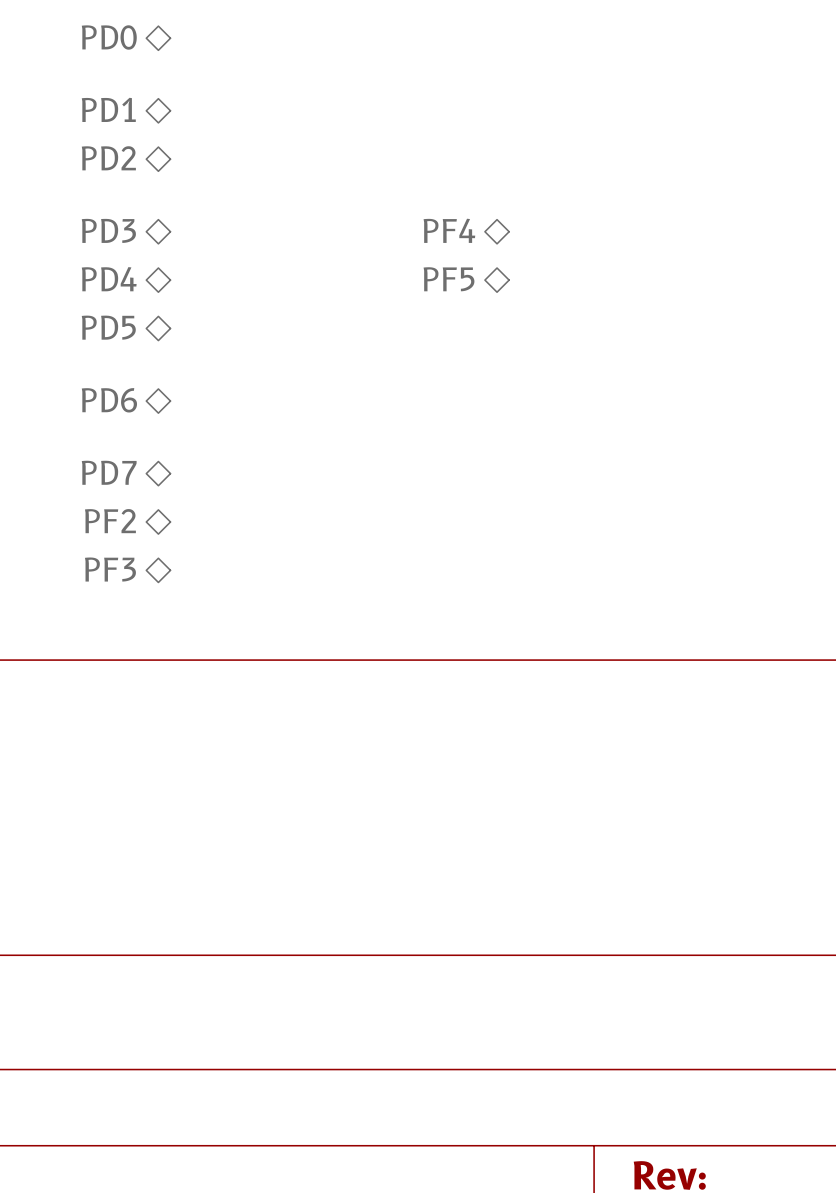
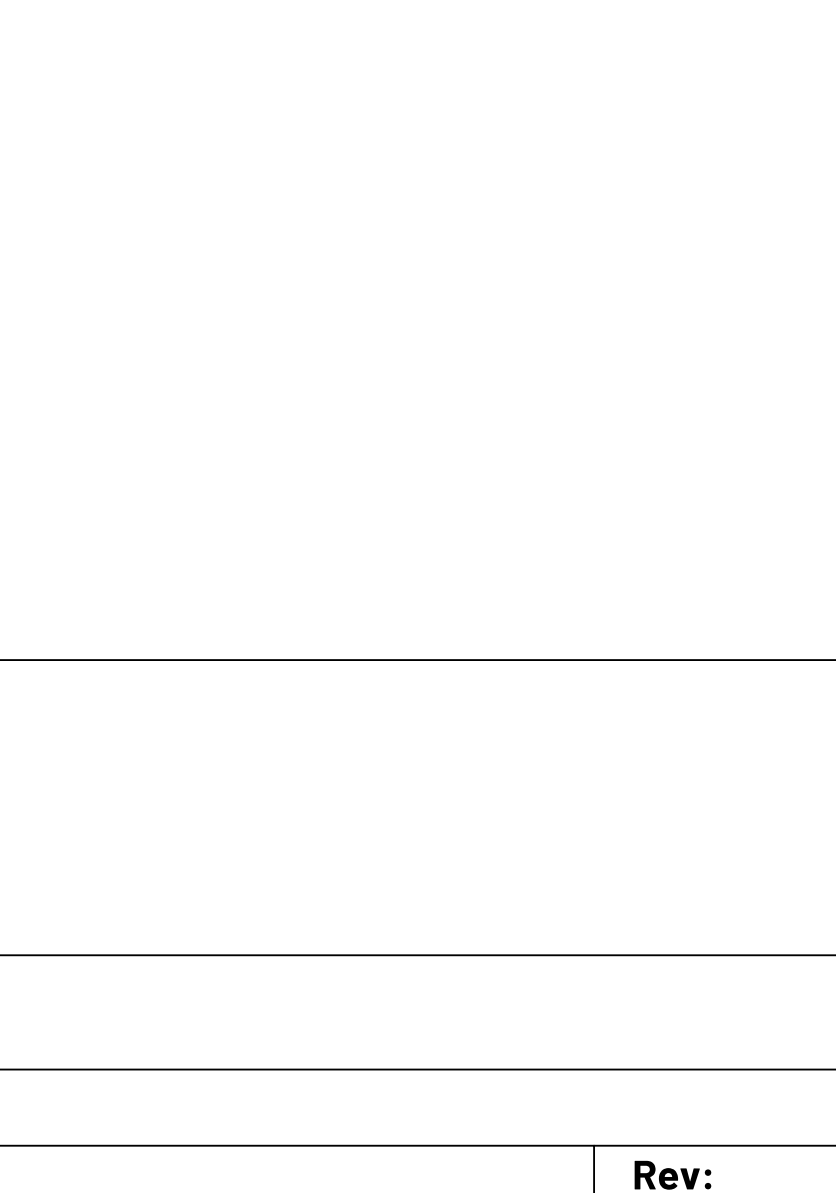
hierarchical label: PD0 (109, 37) -> none
hierarchical label: PD1 (108, 109) -> none
hierarchical label: PD2 (108, 158) -> none
hierarchical label: PD3 (108, 230) -> none
hierarchical label: PF4 (449, 230) -> none
hierarchical label: PD4 (109, 279) -> none
hierarchical label: PF5 (449, 279) -> none
hierarchical label: PD5 (108, 327) -> none
hierarchical label: PD6 (109, 400) -> none
hierarchical label: PD7 (109, 472) -> none
hierarchical label: PF2 (110, 521) -> none
hierarchical label: PF3 (110, 569) -> none

